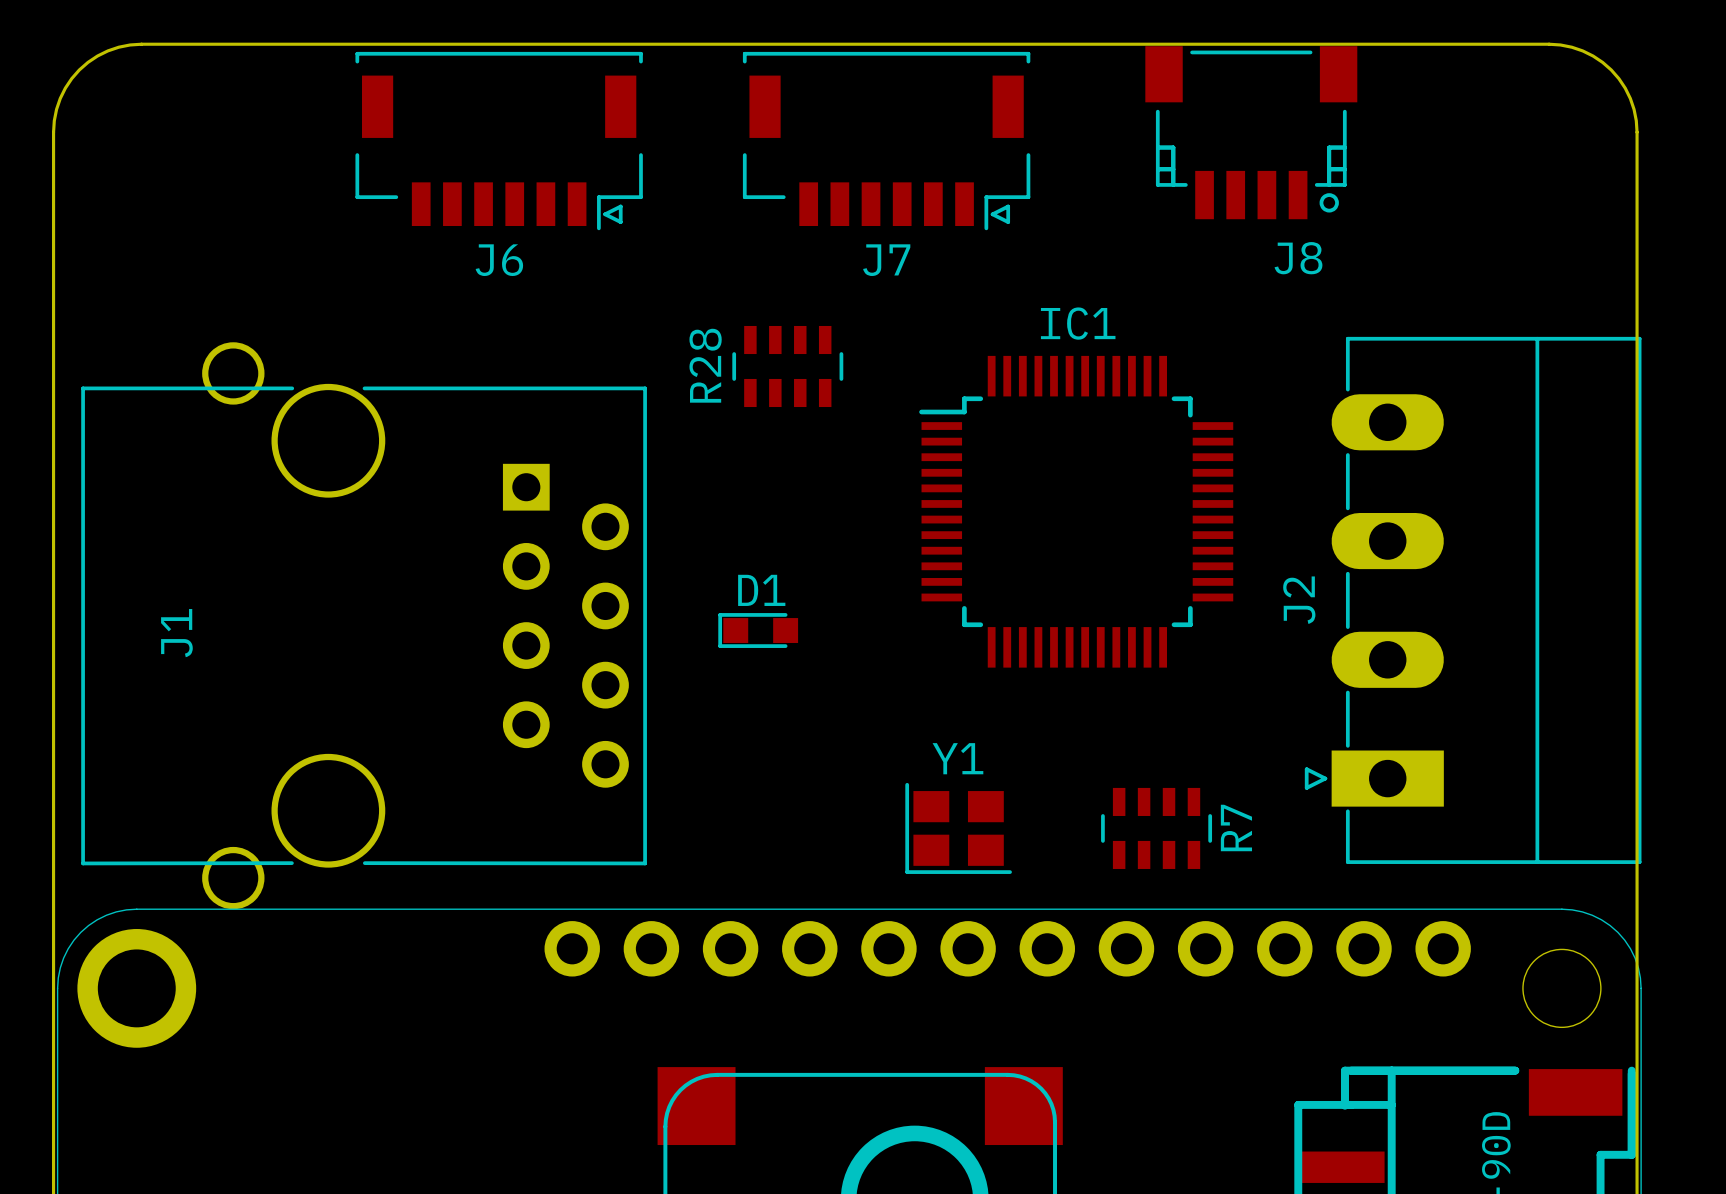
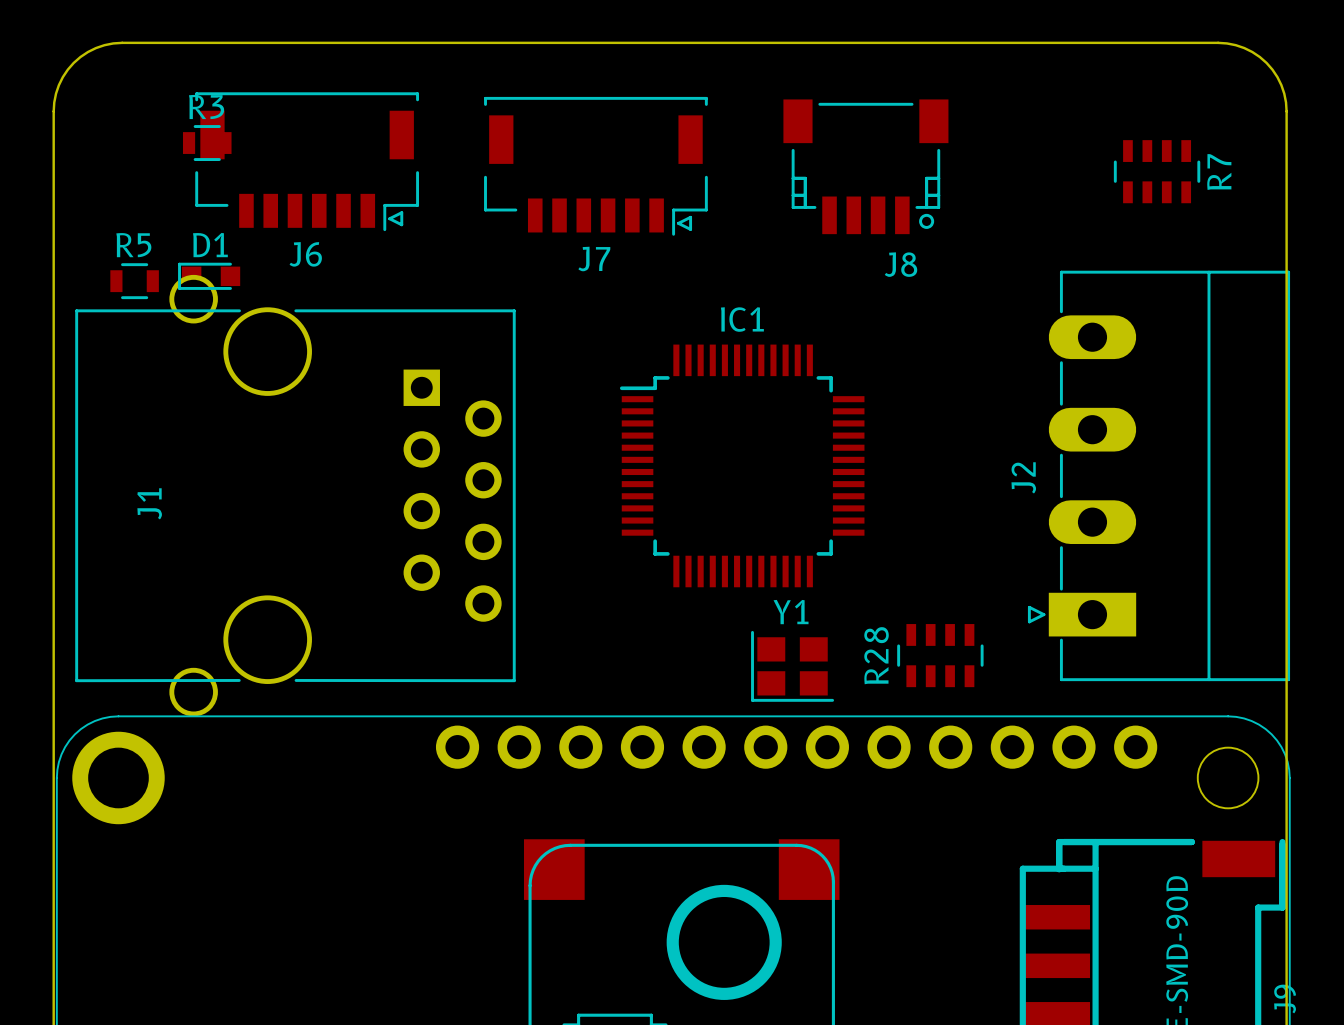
J8 position: (1251, 132) -> (865, 166)
J6 position: (499, 141) -> (307, 161)
J7 position: (886, 141) -> (595, 166)
R3: none -> (207, 143)
R5: none -> (134, 281)
R28 position: (787, 366) -> (940, 655)
IC1 position: (1076, 511) -> (742, 465)
D1 position: (758, 630) -> (209, 276)
Y1 position: (958, 828) -> (792, 666)
R7 position: (1156, 828) -> (1157, 171)

